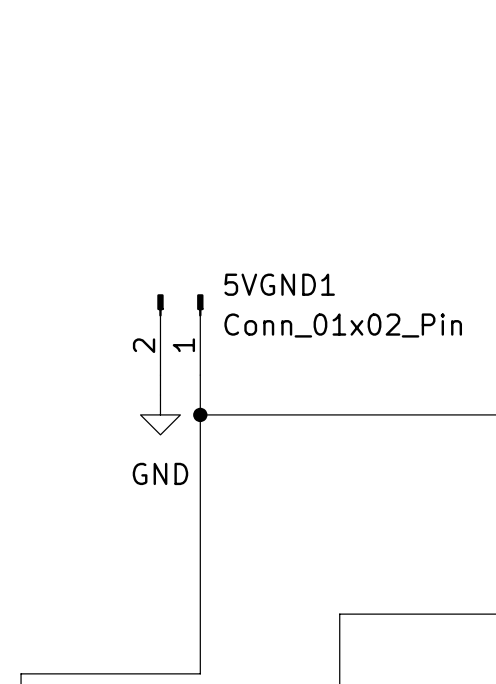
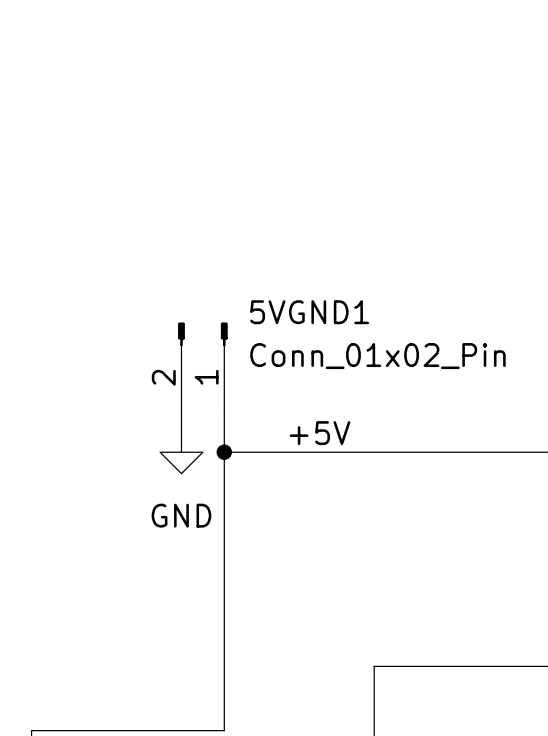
label: none -> +5V (320, 433)

